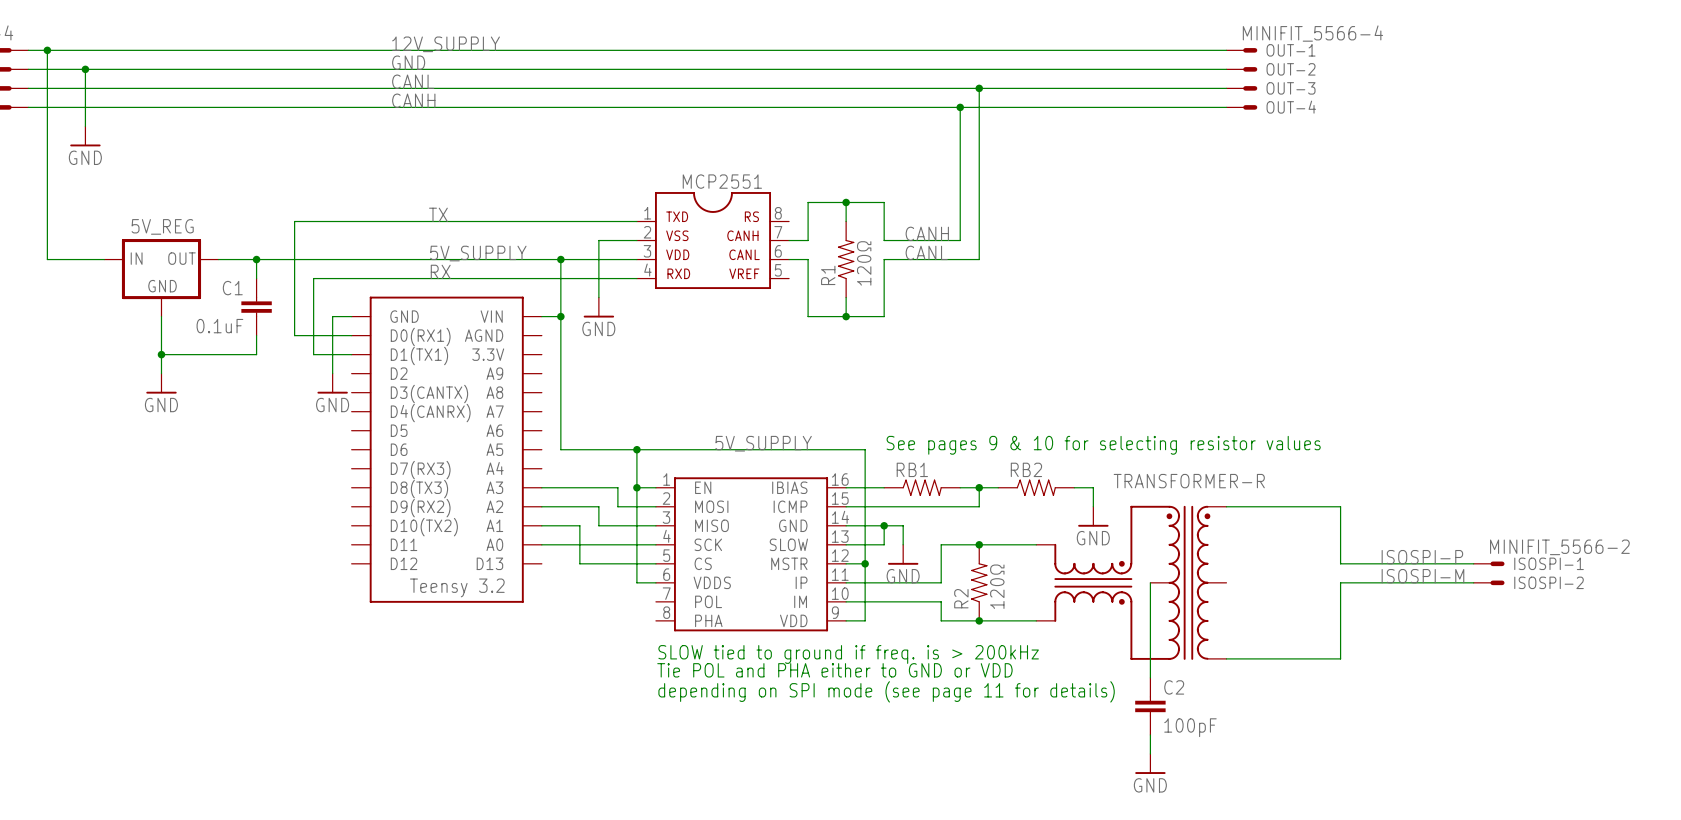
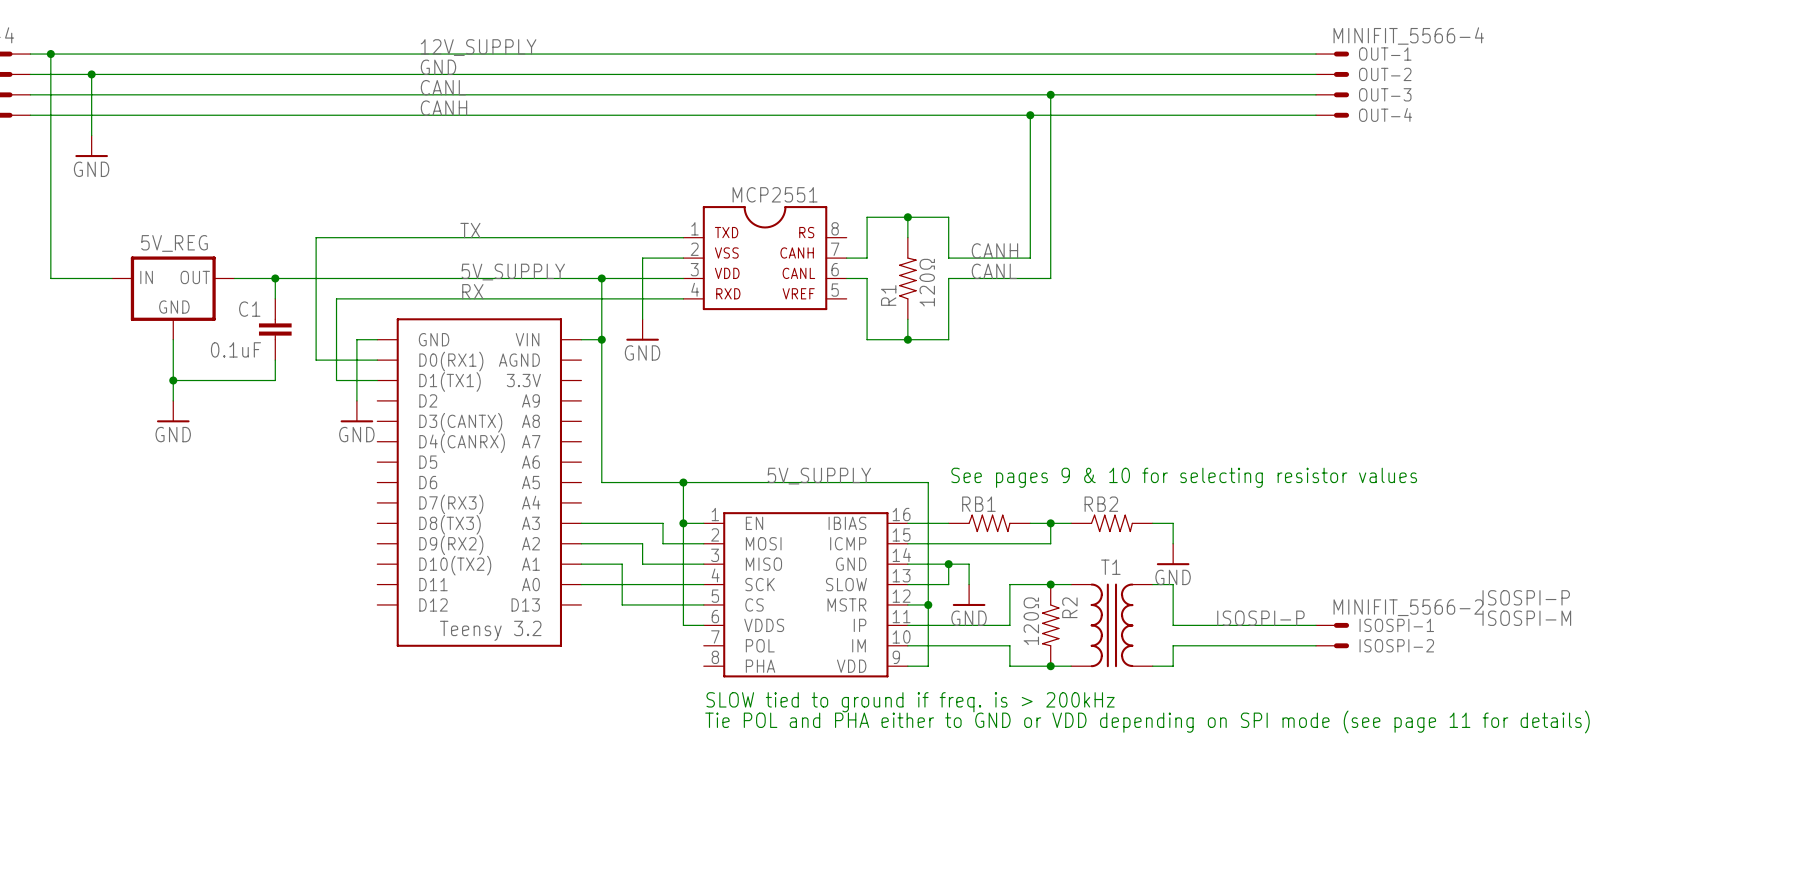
wire: (1226, 506) (1340, 506) (1340, 563) (1473, 563) -> none
wire: none -> (1152, 584) (1173, 584) (1173, 625) (1315, 625)
ISOSPI-1 position: (1489, 563) -> (1332, 625)
label: none -> ISOSPI-P (1260, 618)
R2 rotation: 0° (979, 582) -> 180° (1050, 625)
T1: none -> (1111, 625)
TRANSFORMER-R: (1131, 582) -> none
wire: (1150, 582) (1150, 677) -> none
wire: (1473, 582) (1340, 582) (1340, 658) (1226, 658) -> none
ISOSPI-2 position: (1489, 582) -> (1332, 645)
wire: none -> (1315, 645) (1173, 645) (1173, 666) (1152, 666)
text: Tie POL and PHA either to GND or VDD (834, 670) -> Tie POL and PHA either to GND or VDD depending on SPI mode (see page 11 for details) (1147, 721)
text: depending on SPI mode (see page 11 for details) (886, 691) -> none
C2: 100pF (1150, 706) -> none
wire: (1150, 734) (1150, 754) -> none
power symbol: GND (1150, 763) -> none

